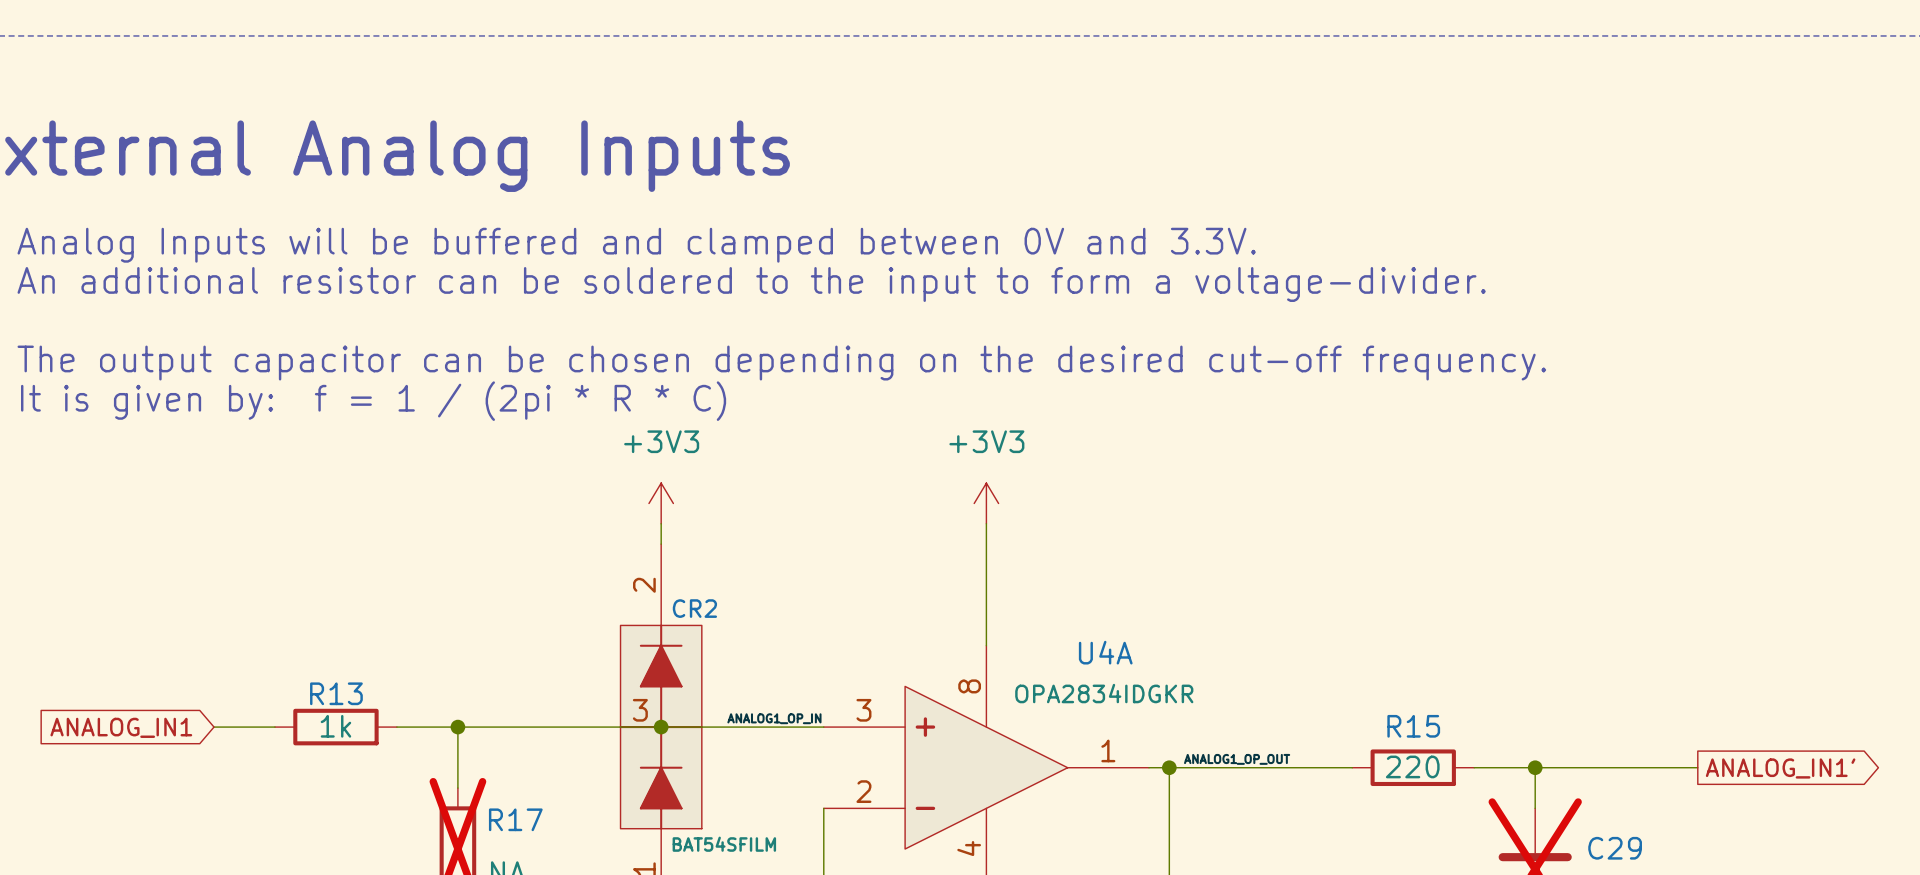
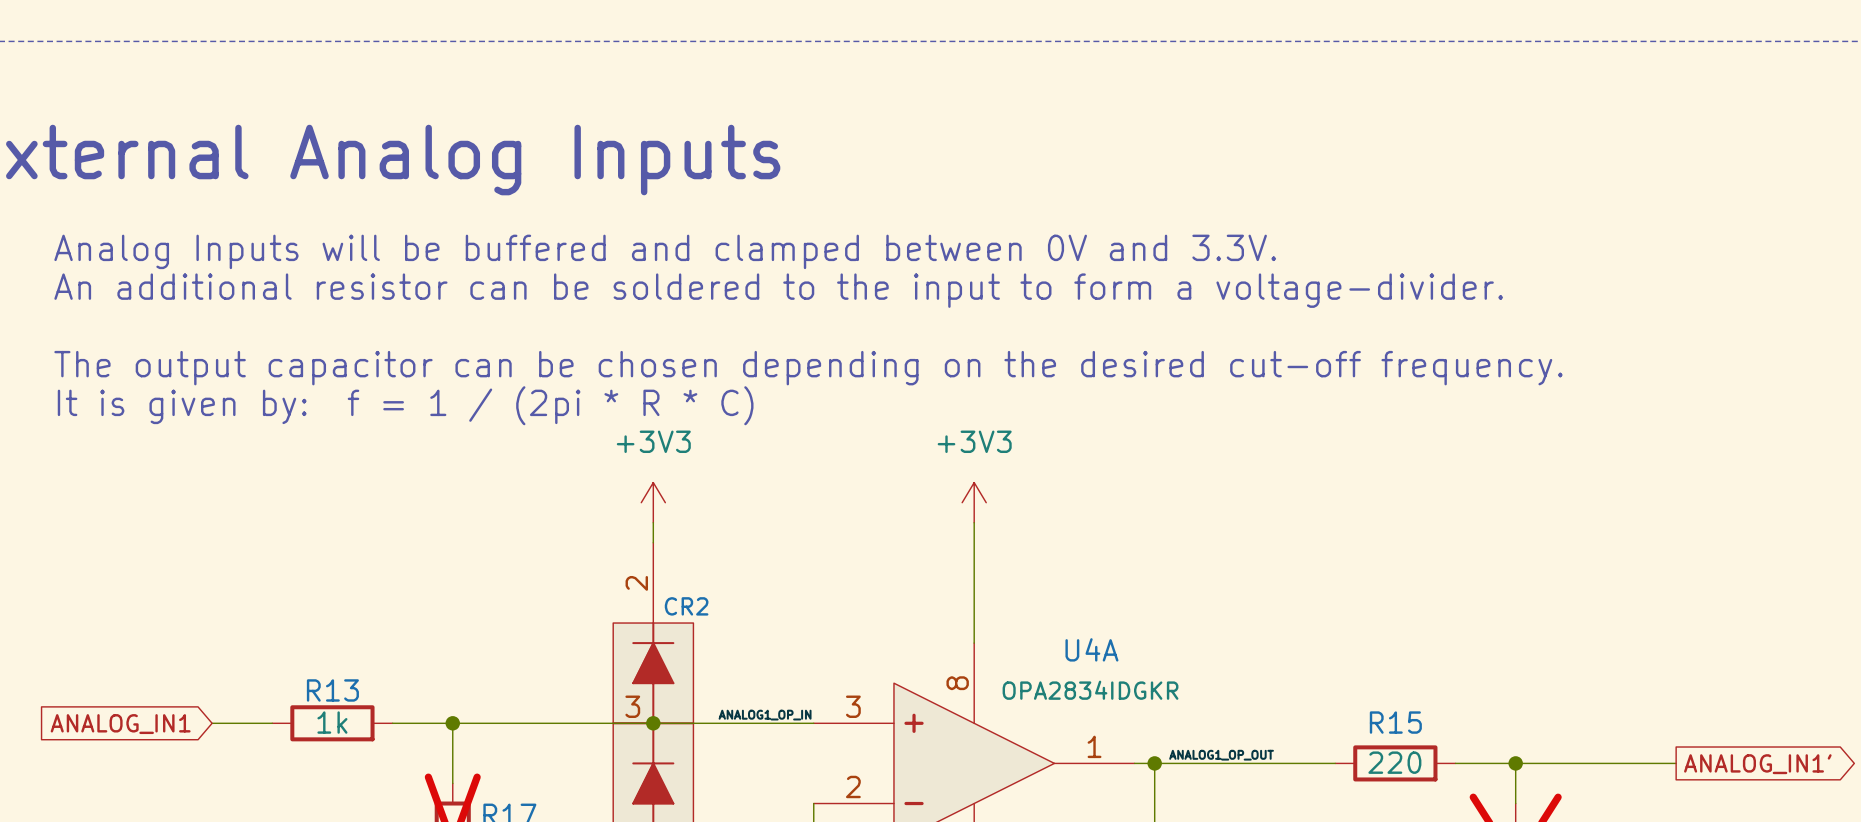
text position: Analog Inputs will be buffered and clamped between 0V and 3.3V. (636, 245) -> Analog Inputs will be buffered and clamped between 0V and 3.3V. (665, 251)
text position: An additional resistor can be soldered to the input to form a voltage-divider. (751, 284) -> An additional resistor can be soldered to the input to form a voltage-divider. (778, 290)
text position: The output capacitor can be chosen depending on the desired cut-off frequency. (781, 363) -> The output capacitor can be chosen depending on the desired cut-off frequency. (808, 368)
text position: It is given by: f = 1 / (2pi * R * C) (373, 401) -> It is given by: f = 1 / (2pi * R * C) (405, 405)

